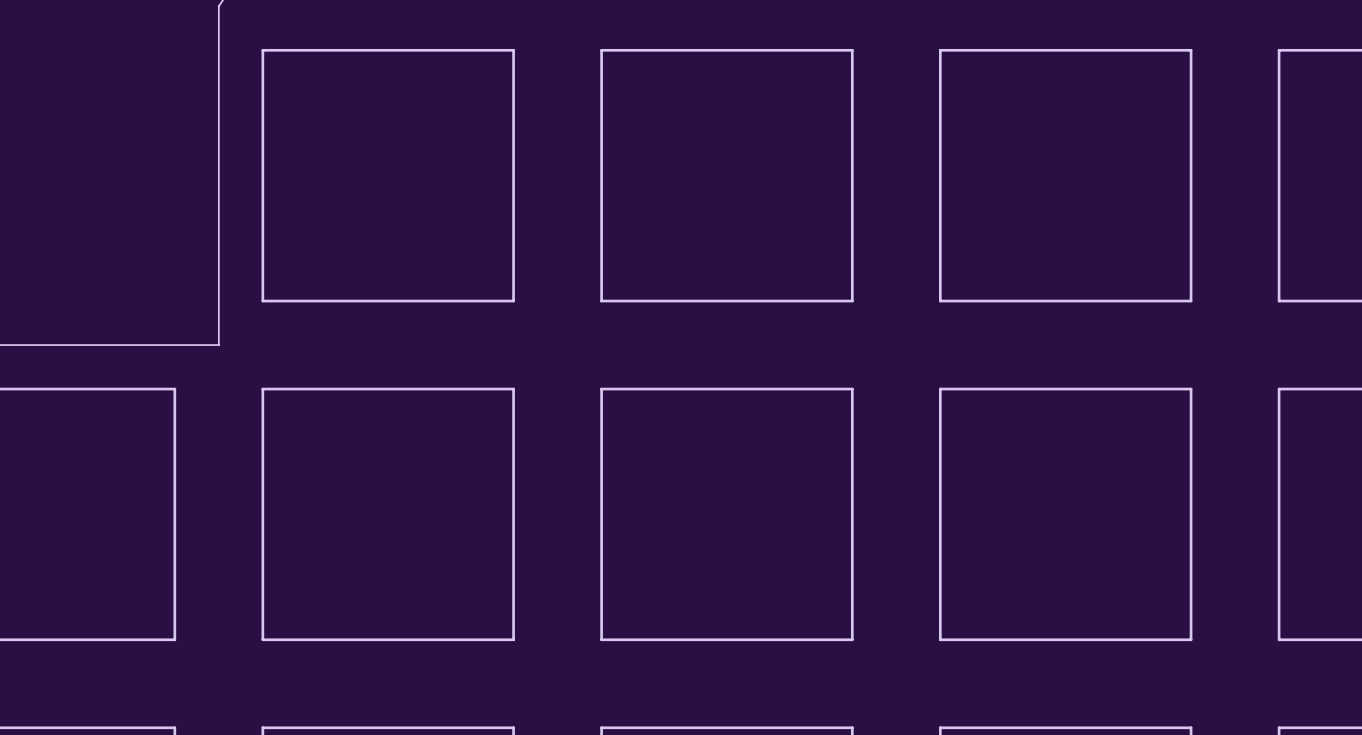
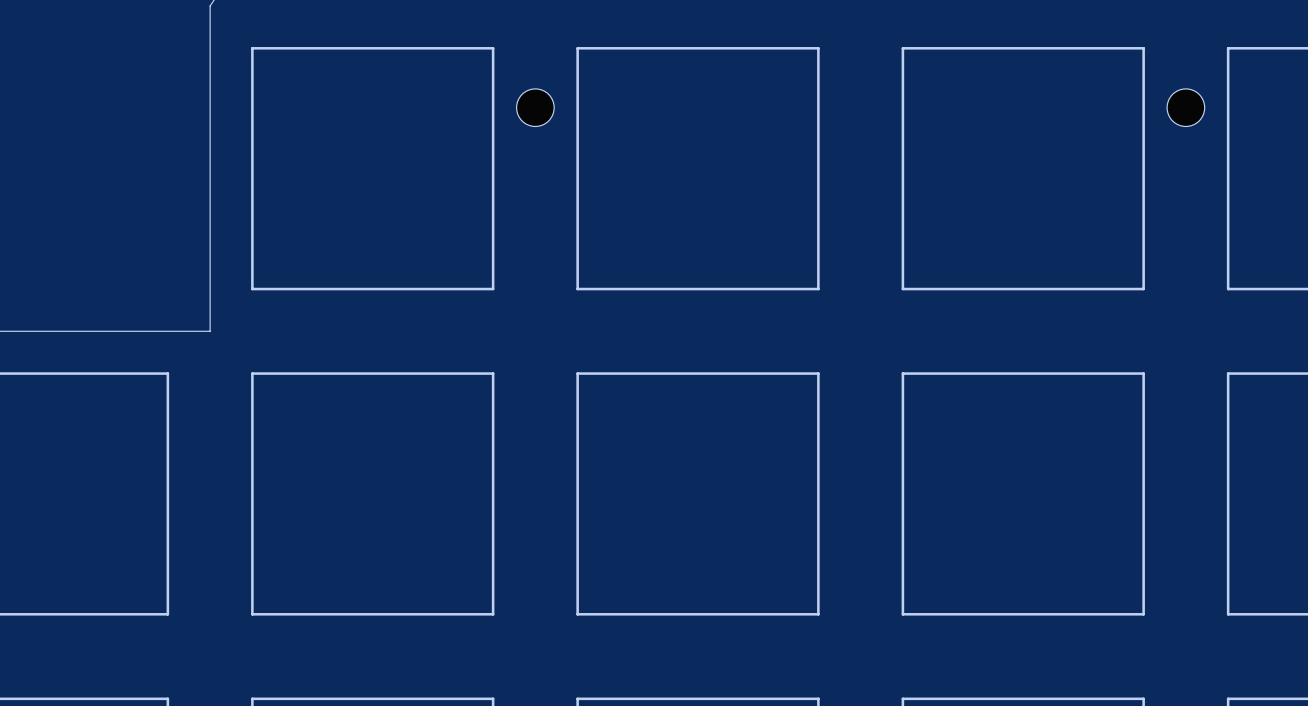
part: none -> (535, 107)
part: none -> (1185, 107)

